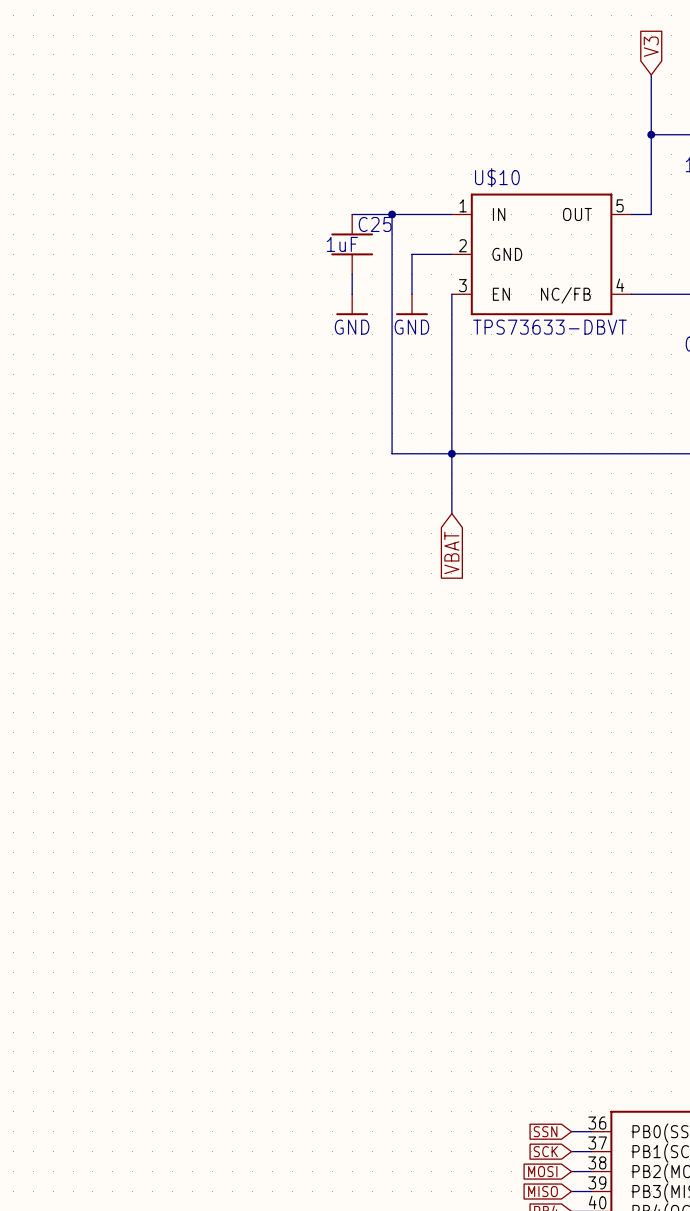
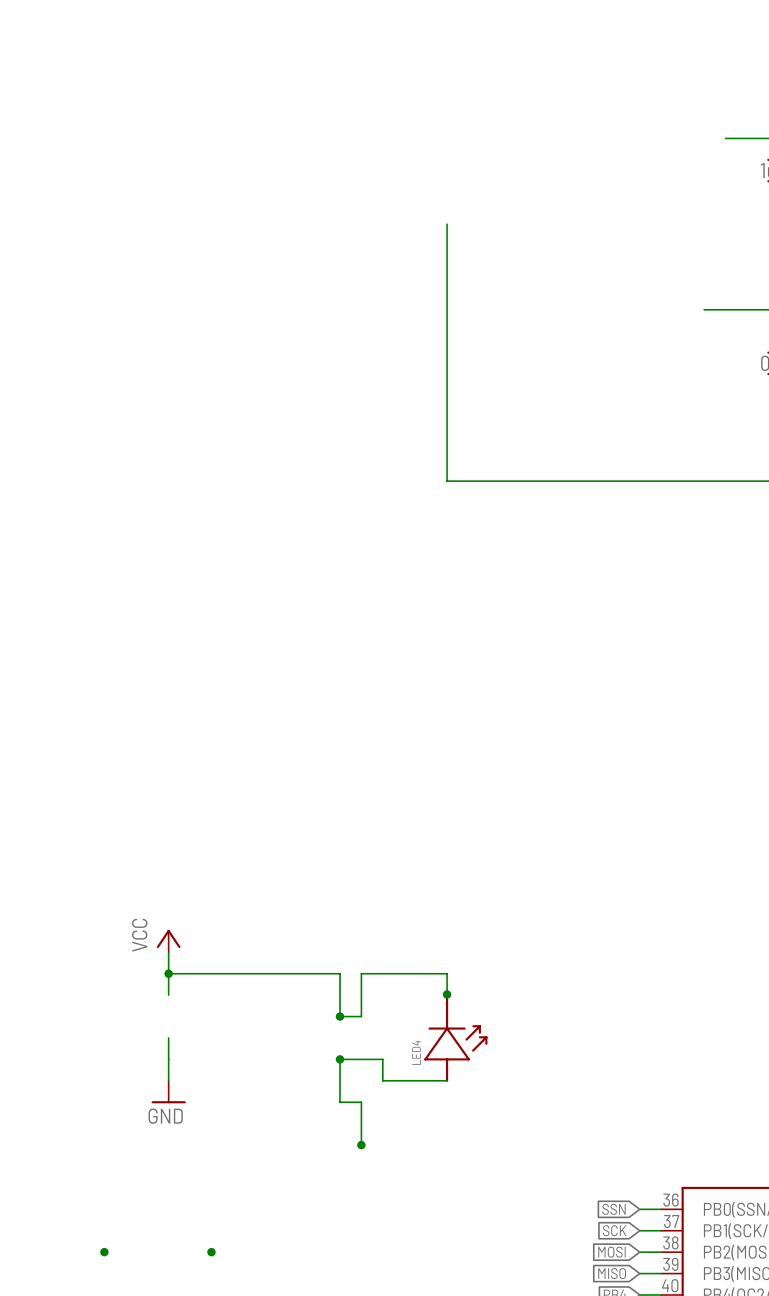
global label: V3 (651, 46) -> none
wire: (651, 74) (651, 214) (631, 214) -> none
junction: (651, 134) -> none
wire: (352, 214) (451, 214) -> none
junction: (392, 214) -> none
C25: 1uF (352, 244) -> none
wire: (451, 254) (411, 254) (411, 294) -> none
U$10: TPS73633-DBVT (541, 254) -> none
wire: (352, 274) (352, 294) -> none
wire: (451, 294) (451, 513) -> none
power symbol: GND (352, 304) -> none
power symbol: GND (411, 304) -> none
junction: (451, 453) -> none
global label: VBAT (451, 552) -> none
power symbol: none -> VCC (168, 941)
wire: none -> (168, 952) (168, 995)
wire: none -> (168, 973) (339, 973) (339, 1016) (361, 1016) (361, 973) (447, 973) (447, 995)
junction: none -> (168, 973)
junction: none -> (447, 994)
junction: none -> (339, 1016)
LED4: none -> (455, 1037)
wire: none -> (168, 1037) (168, 1080)
junction: none -> (339, 1059)
wire: none -> (447, 1080) (382, 1080) (382, 1059) (339, 1059) (339, 1102) (361, 1102) (361, 1145)
power symbol: none -> GND (168, 1092)
junction: none -> (361, 1145)
junction: none -> (104, 1252)
junction: none -> (211, 1252)

